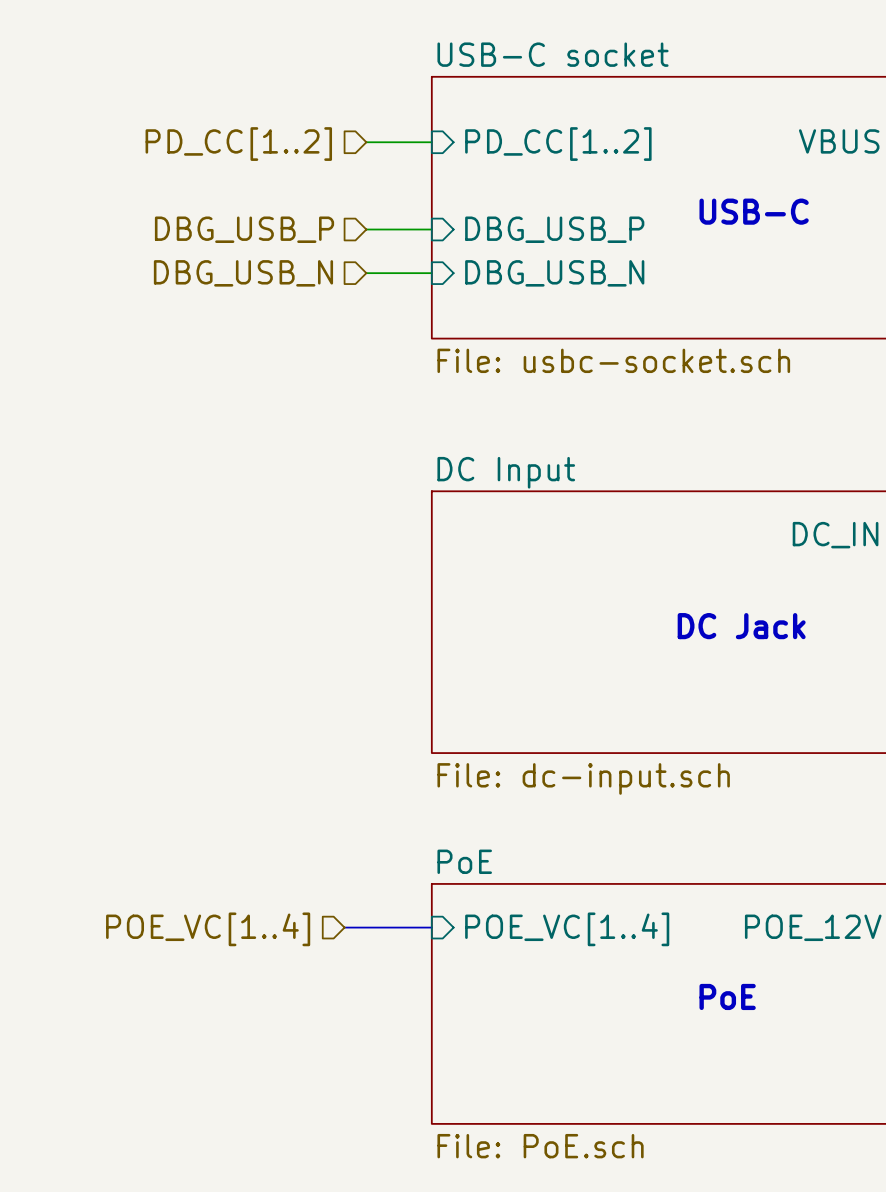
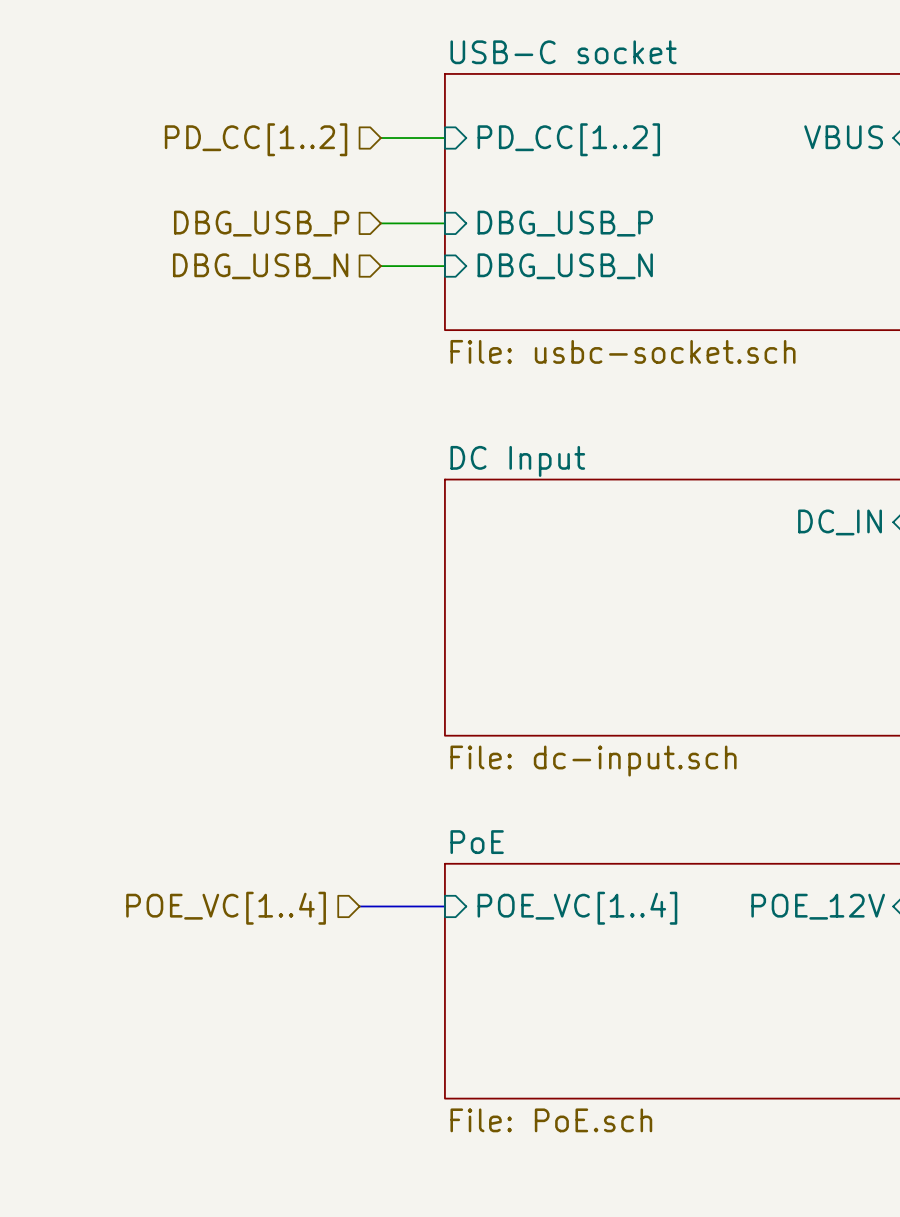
text: USB-C (754, 211) -> none
text: DC Jack (741, 626) -> none
text: PoE (727, 996) -> none

